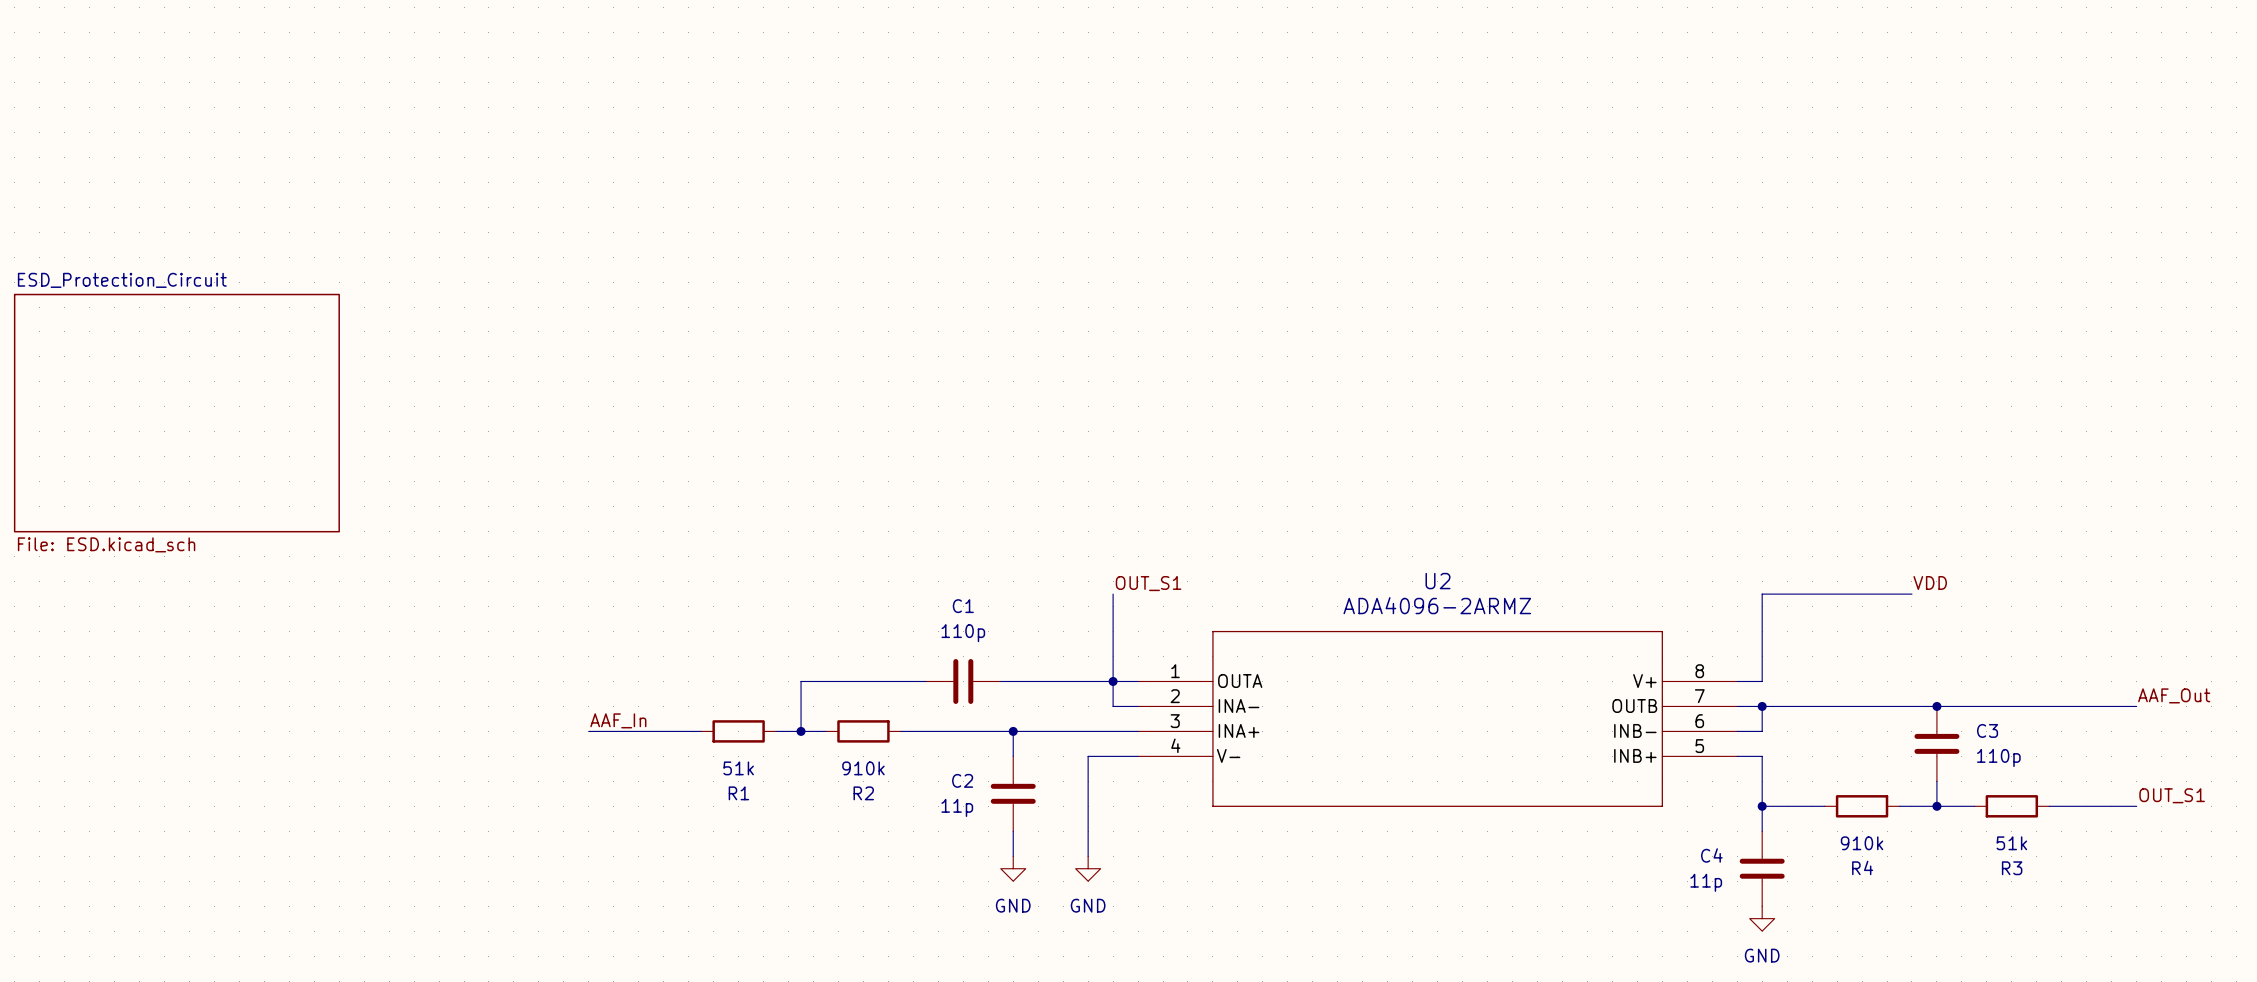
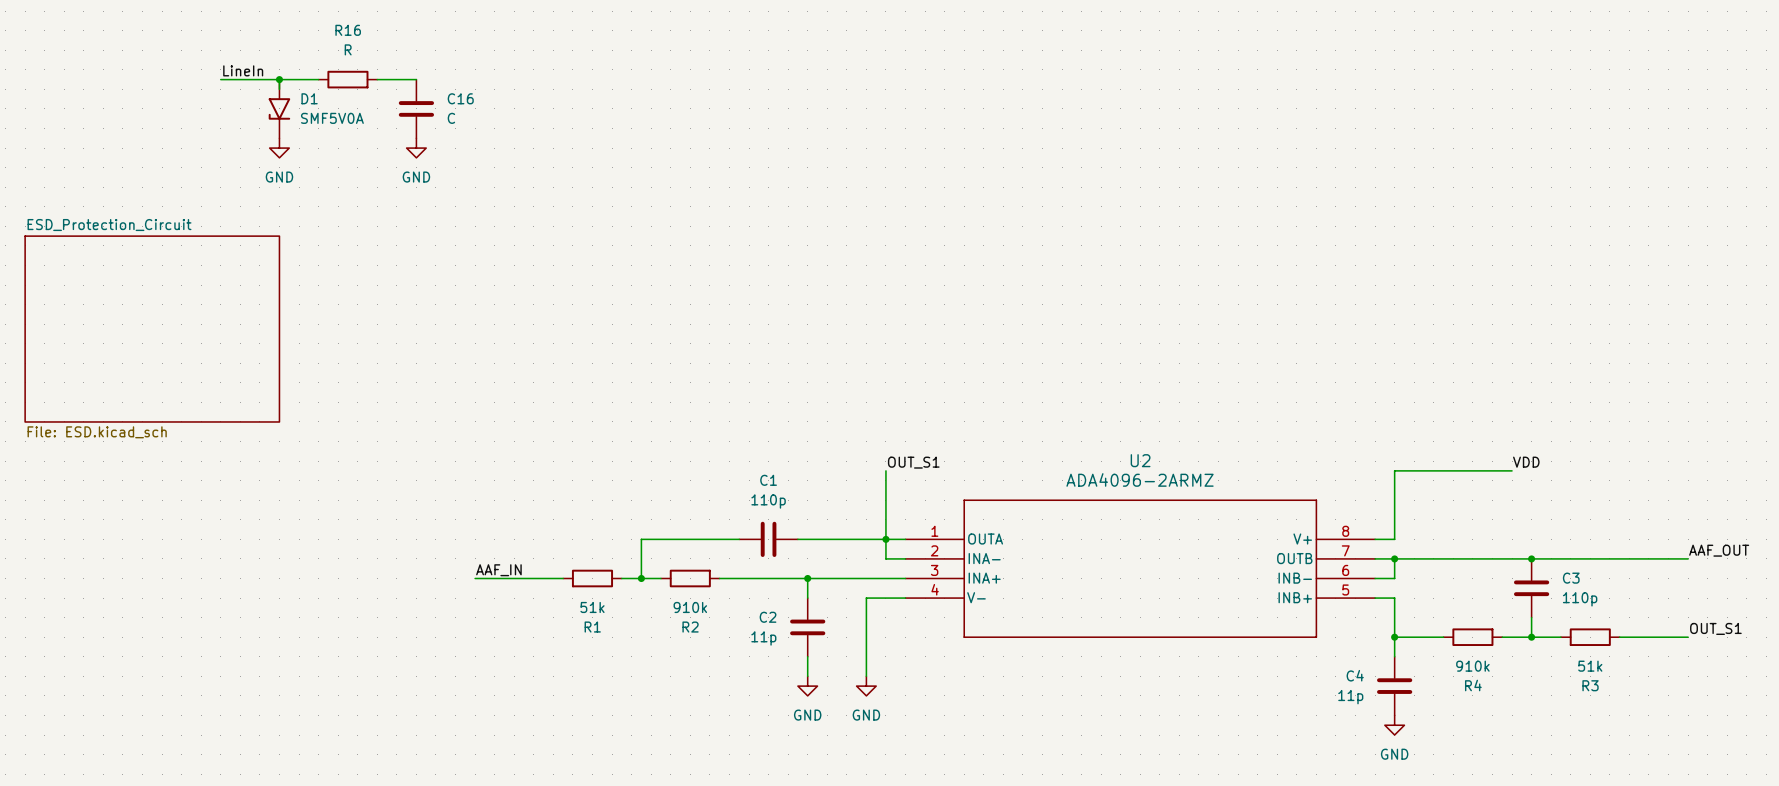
label: none -> LineIn (243, 70)
wire: none -> (220, 79) (318, 79)
wire: none -> (279, 79) (279, 89)
junction: none -> (279, 79)
R16: none -> R (347, 79)
wire: none -> (377, 79) (416, 79)
D1: none -> SMF5V0A (279, 108)
C16: none -> C (416, 108)
power symbol: none -> GND (279, 148)
power symbol: none -> GND (416, 148)
label: AAF_Out (2174, 695) -> AAF_OUT (1719, 550)
label: AAF_In (618, 720) -> AAF_IN (498, 570)

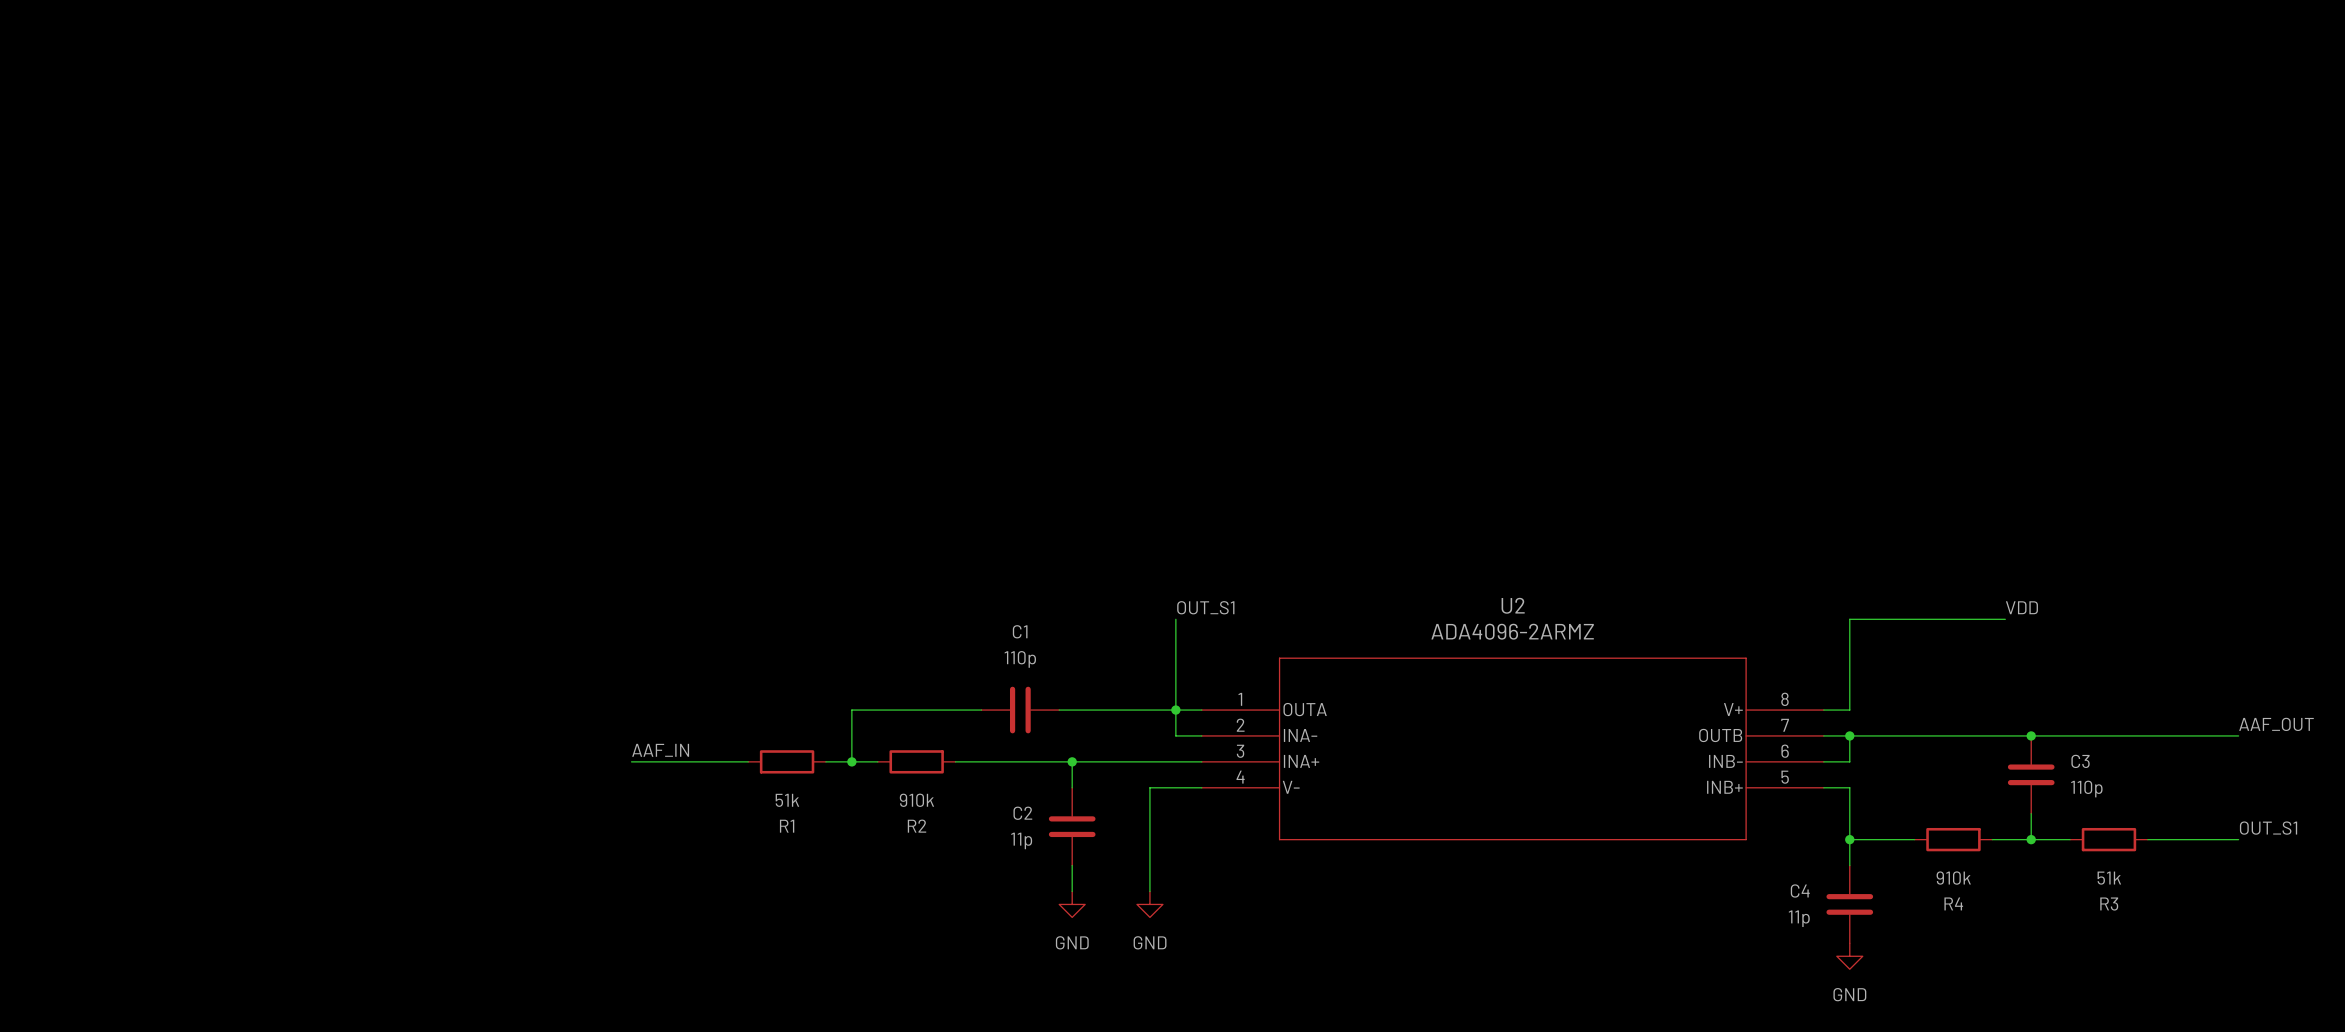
label: LineIn (243, 70) -> none
wire: (220, 79) (318, 79) -> none
wire: (279, 79) (279, 89) -> none
junction: (279, 79) -> none
R16: R (347, 79) -> none
wire: (377, 79) (416, 79) -> none
D1: SMF5V0A (279, 108) -> none
C16: C (416, 108) -> none
power symbol: GND (279, 148) -> none
power symbol: GND (416, 148) -> none
sheet ESD_Protection_Circuit: File: ESD.kicad_sch (152, 329) -> none

